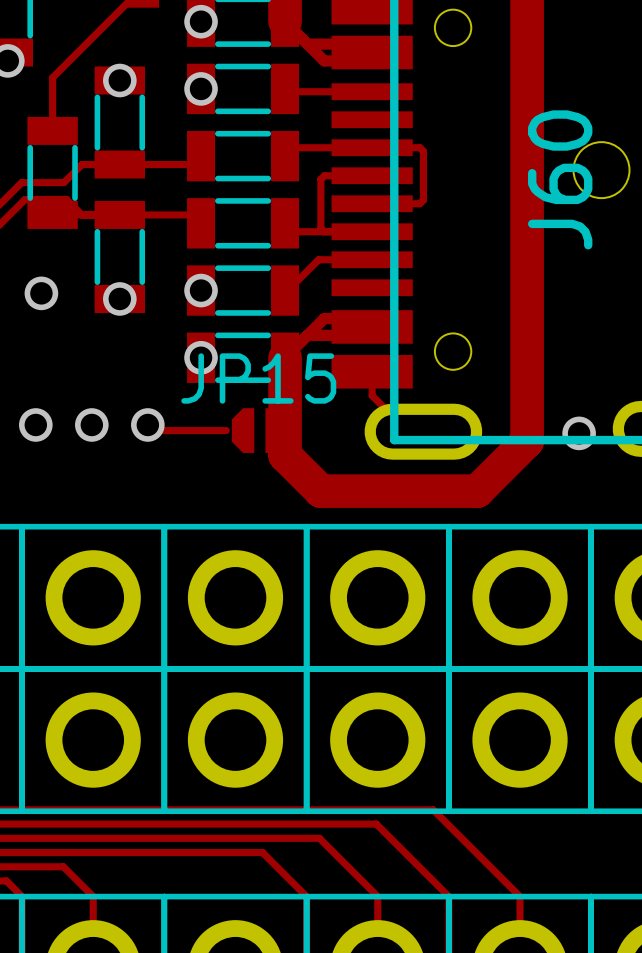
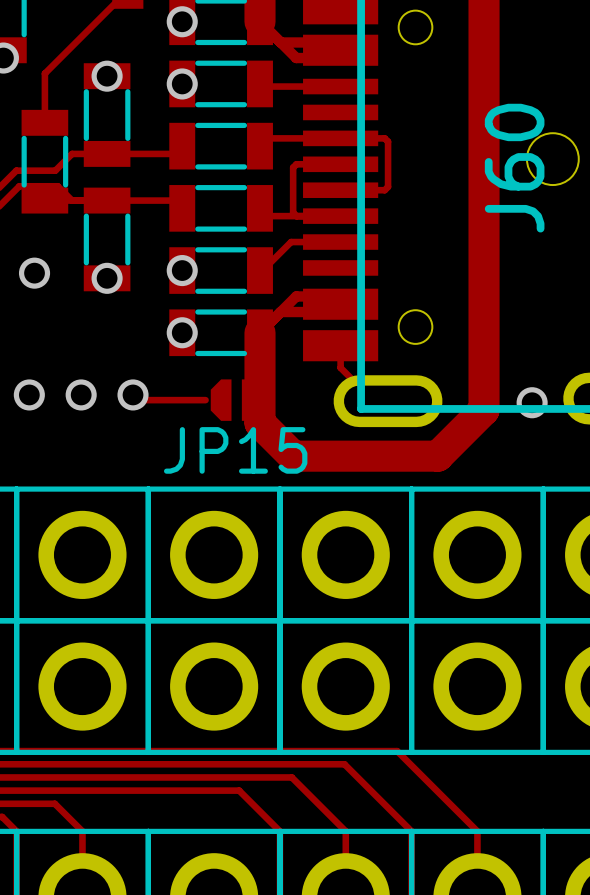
JP15 name position: JP15 (258, 378) -> JP15 (235, 450)

